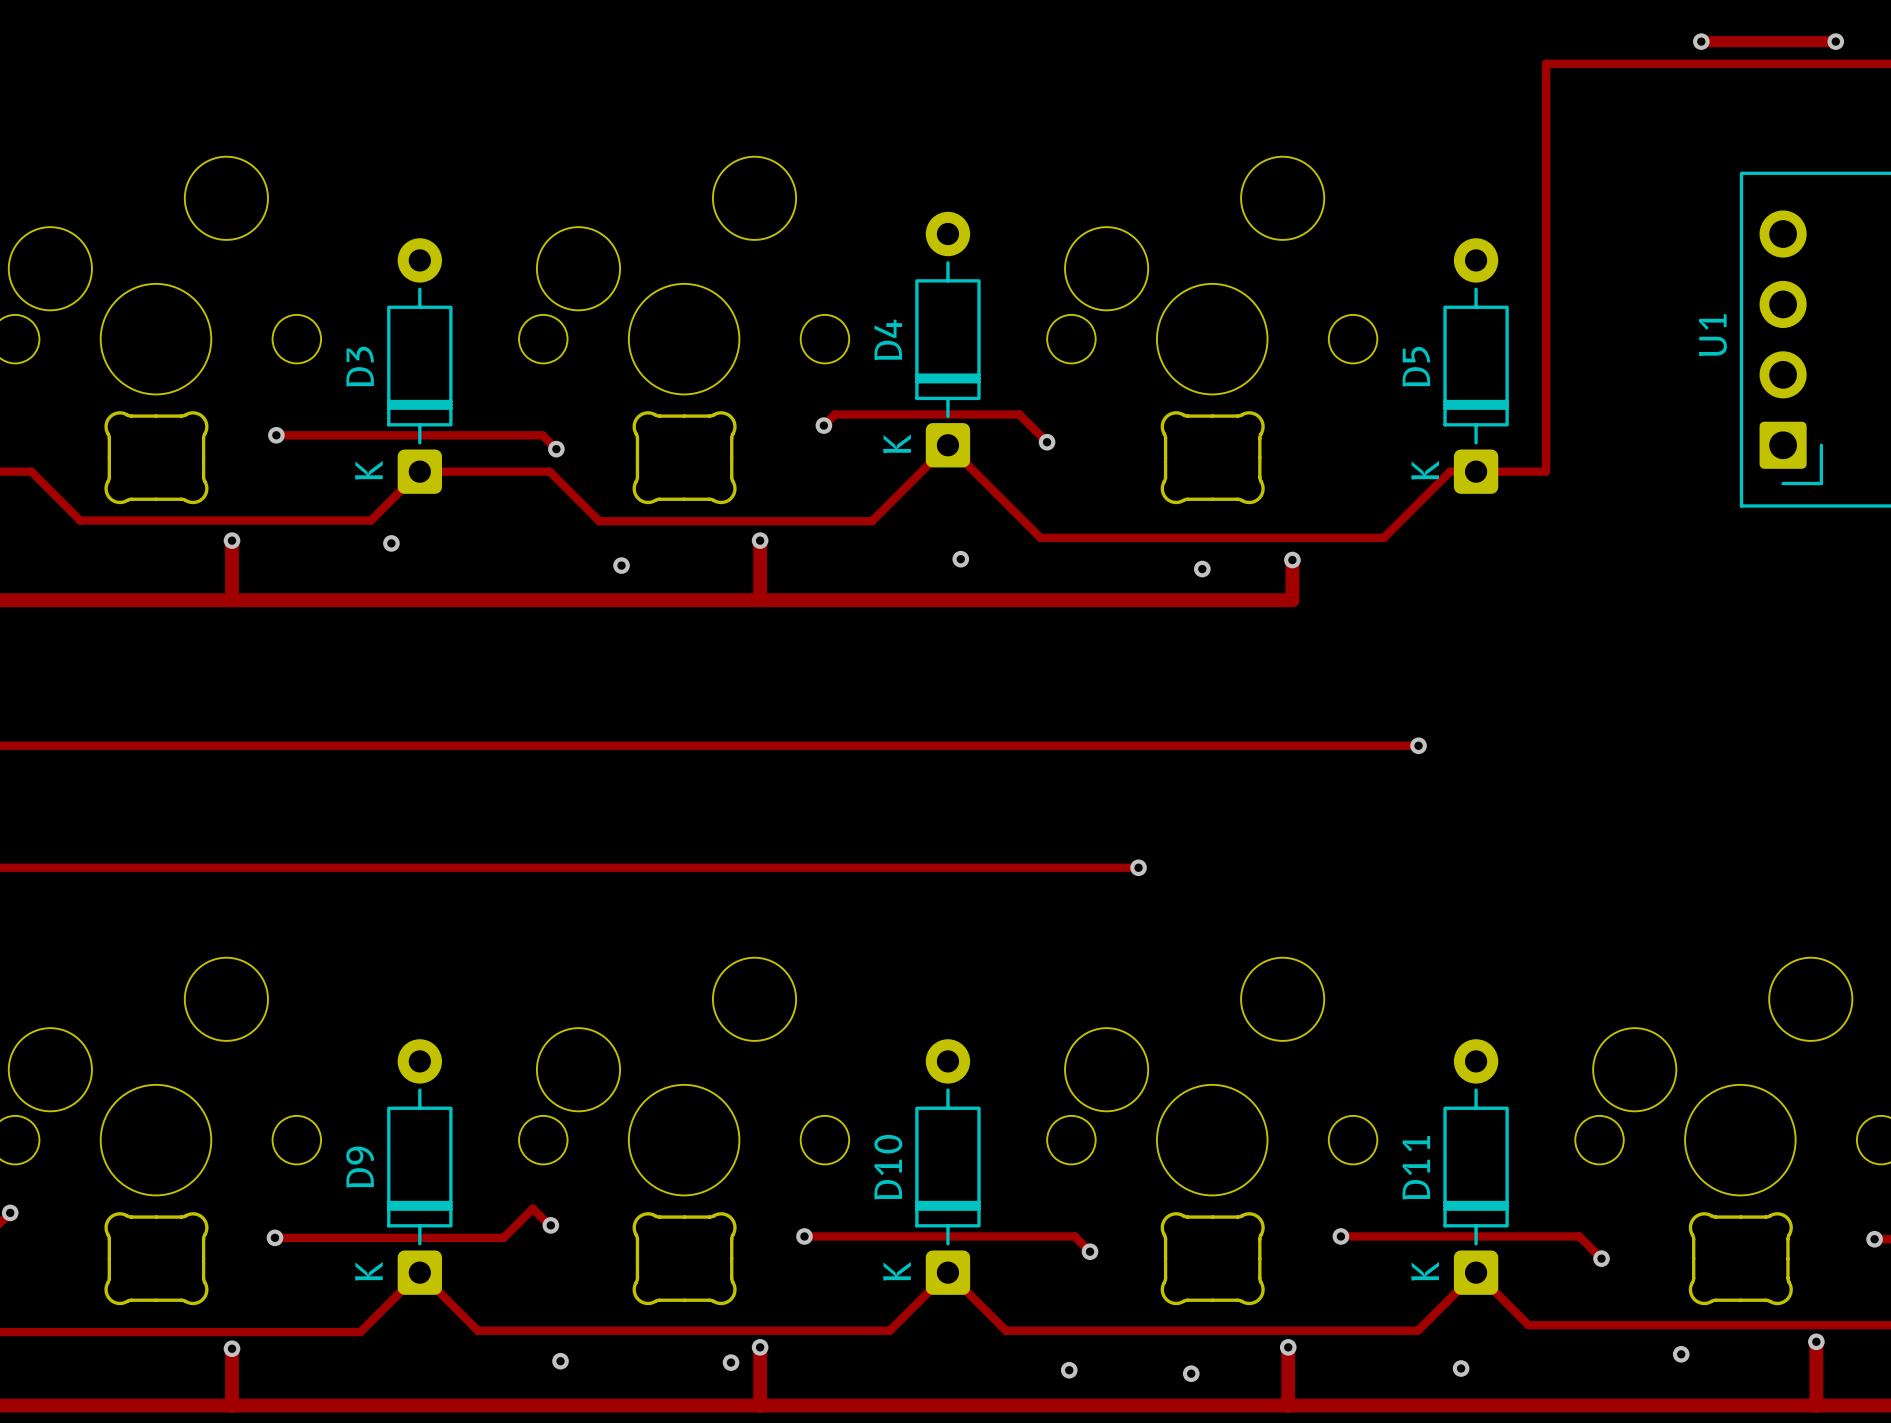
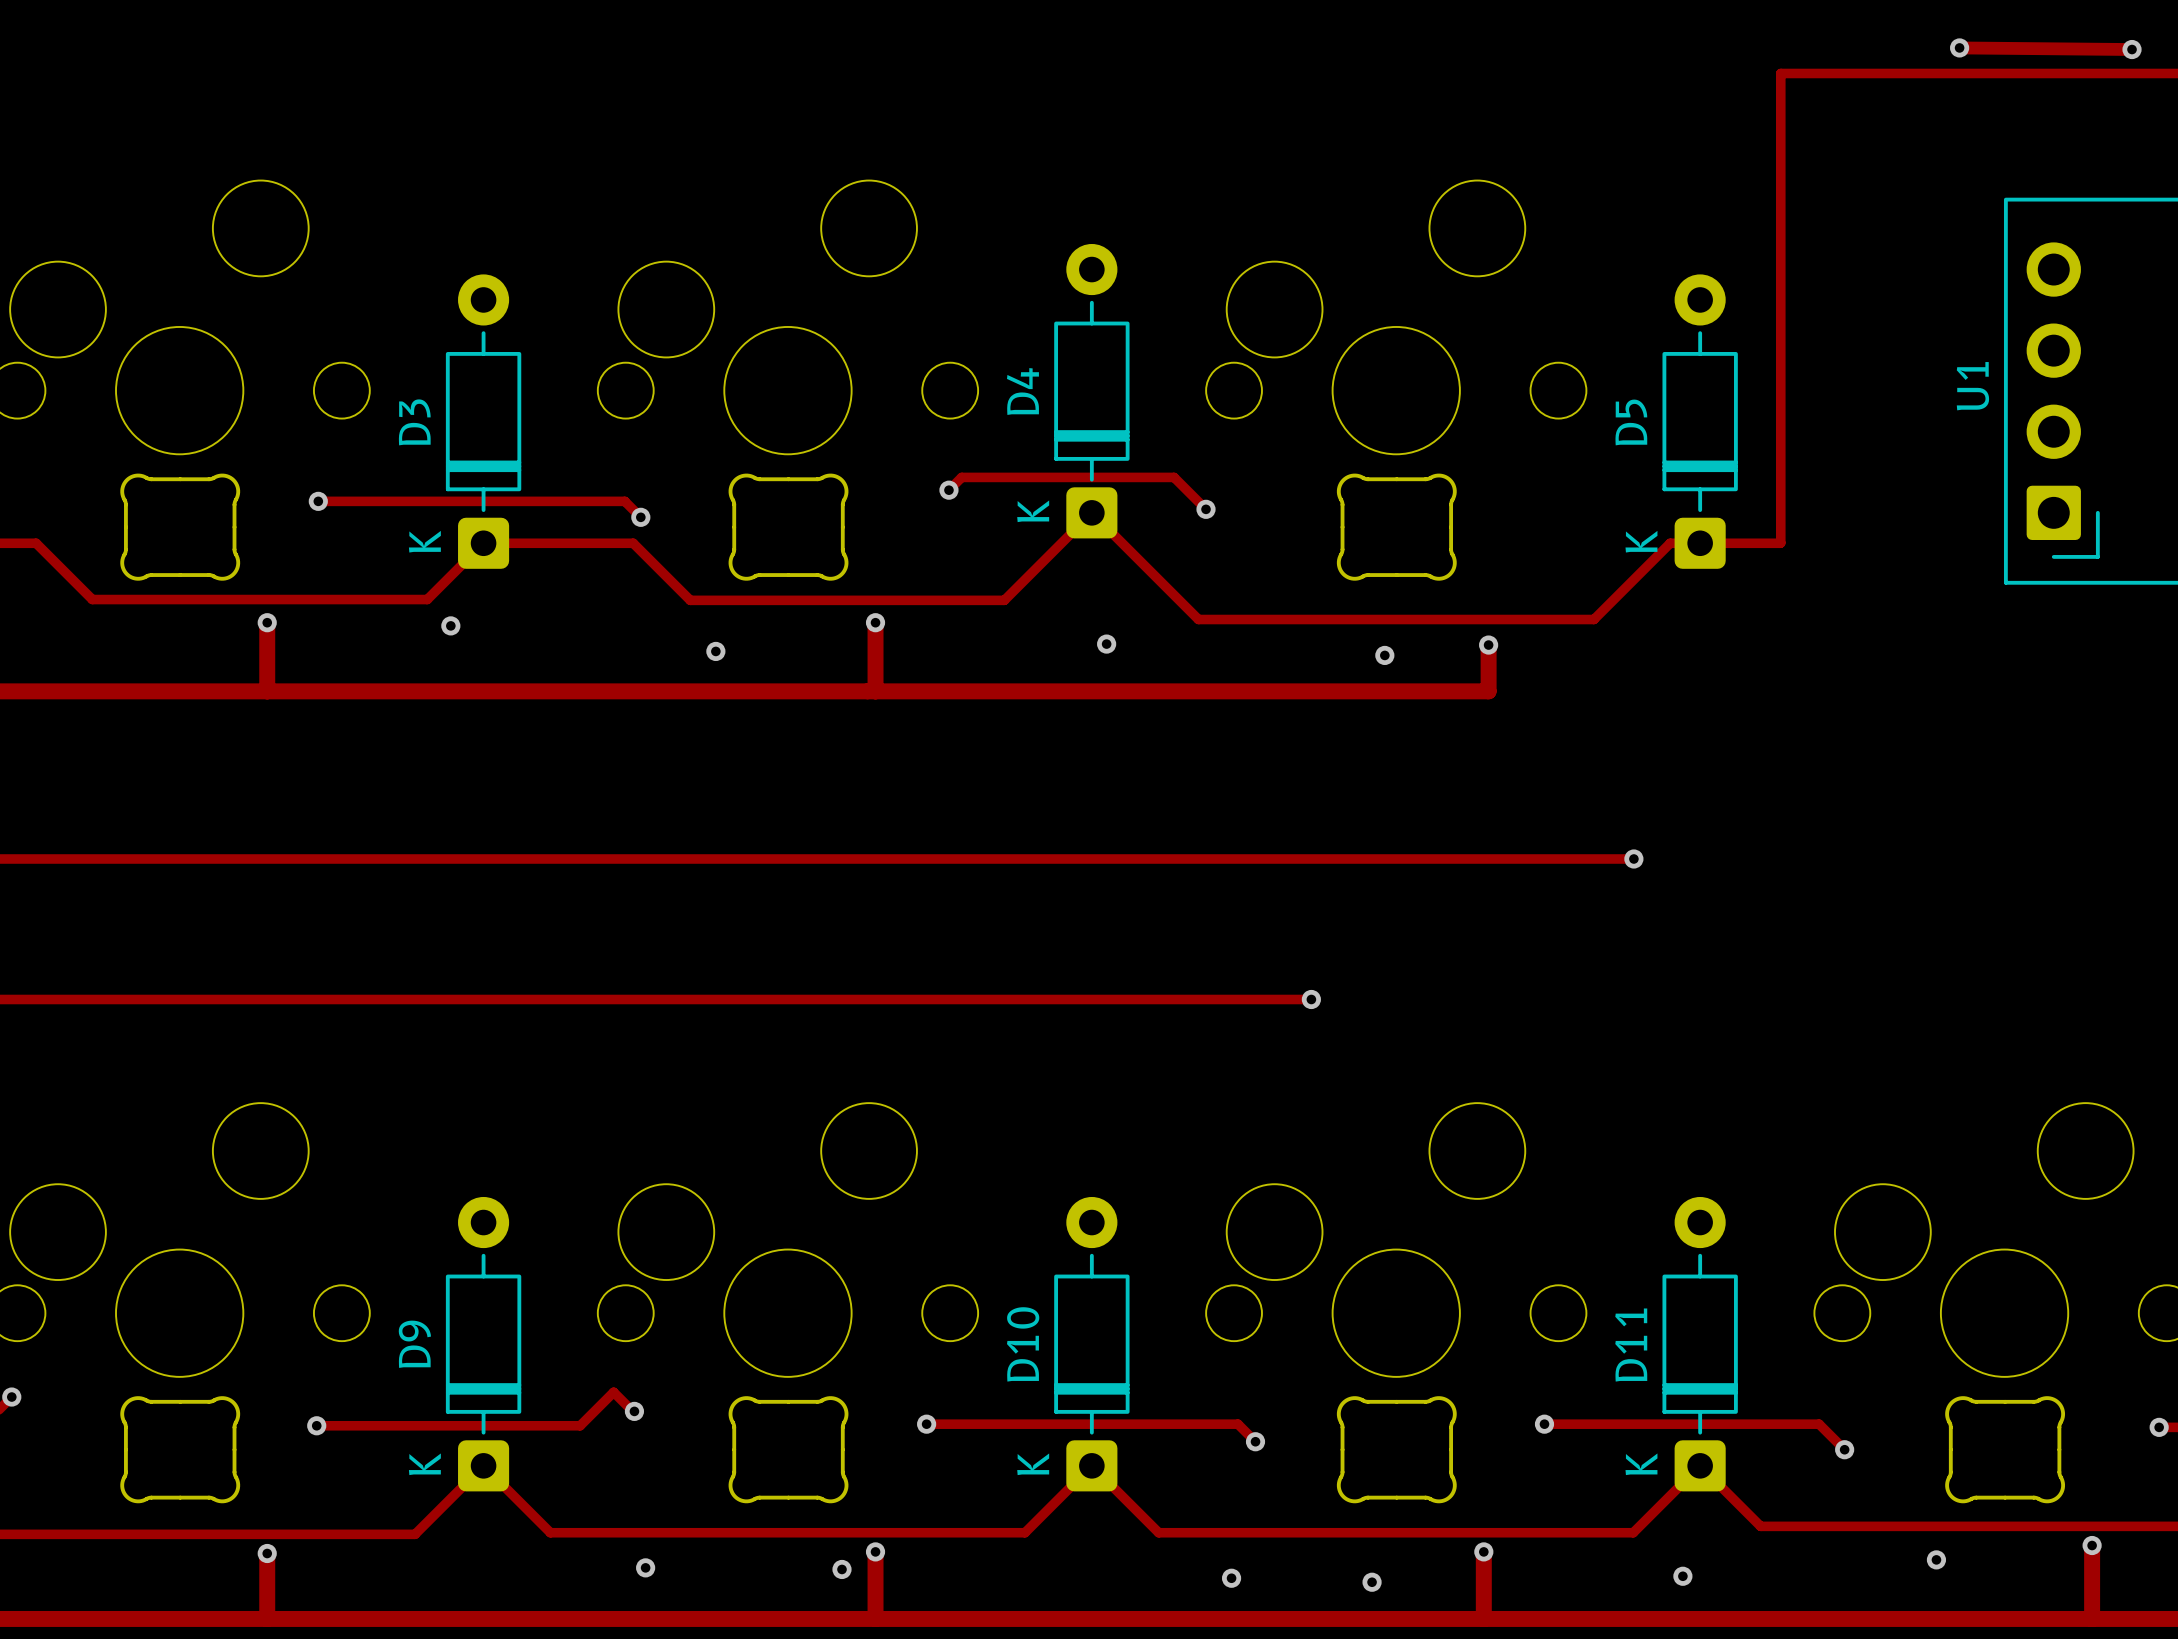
track: (1701, 41) (1835, 41) -> (1959, 47) (2132, 49)
via position: (1835, 41) -> (2132, 49)

